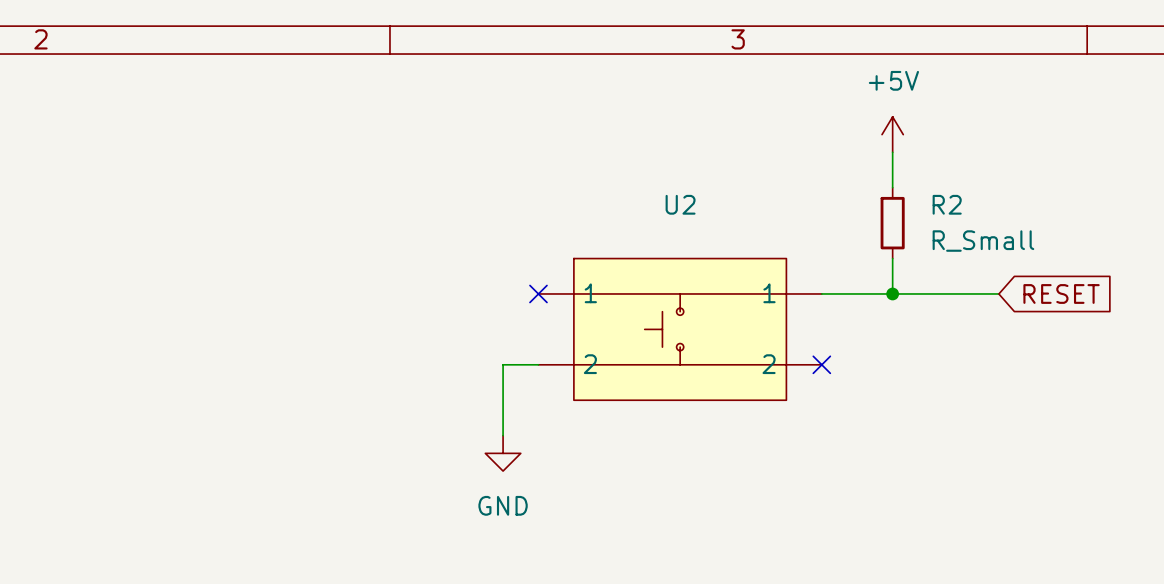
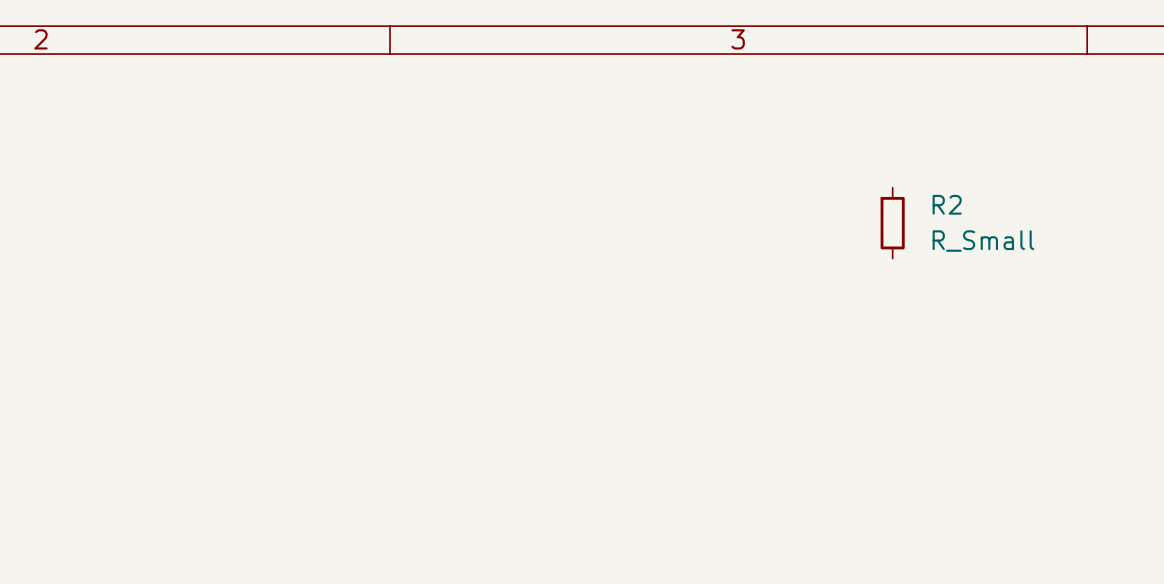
power symbol: +5V (892, 134) -> none
wire: (892, 152) (892, 187) -> none
wire: (892, 258) (892, 293) -> none
no-connect mark: (538, 293) -> none
wire: (821, 293) (998, 293) -> none
junction: (892, 293) -> none
global label: RESET (1061, 293) -> none
U2: (680, 329) -> none
wire: (538, 364) (503, 364) (503, 435) -> none
no-connect mark: (821, 364) -> none
power symbol: GND (503, 453) -> none

